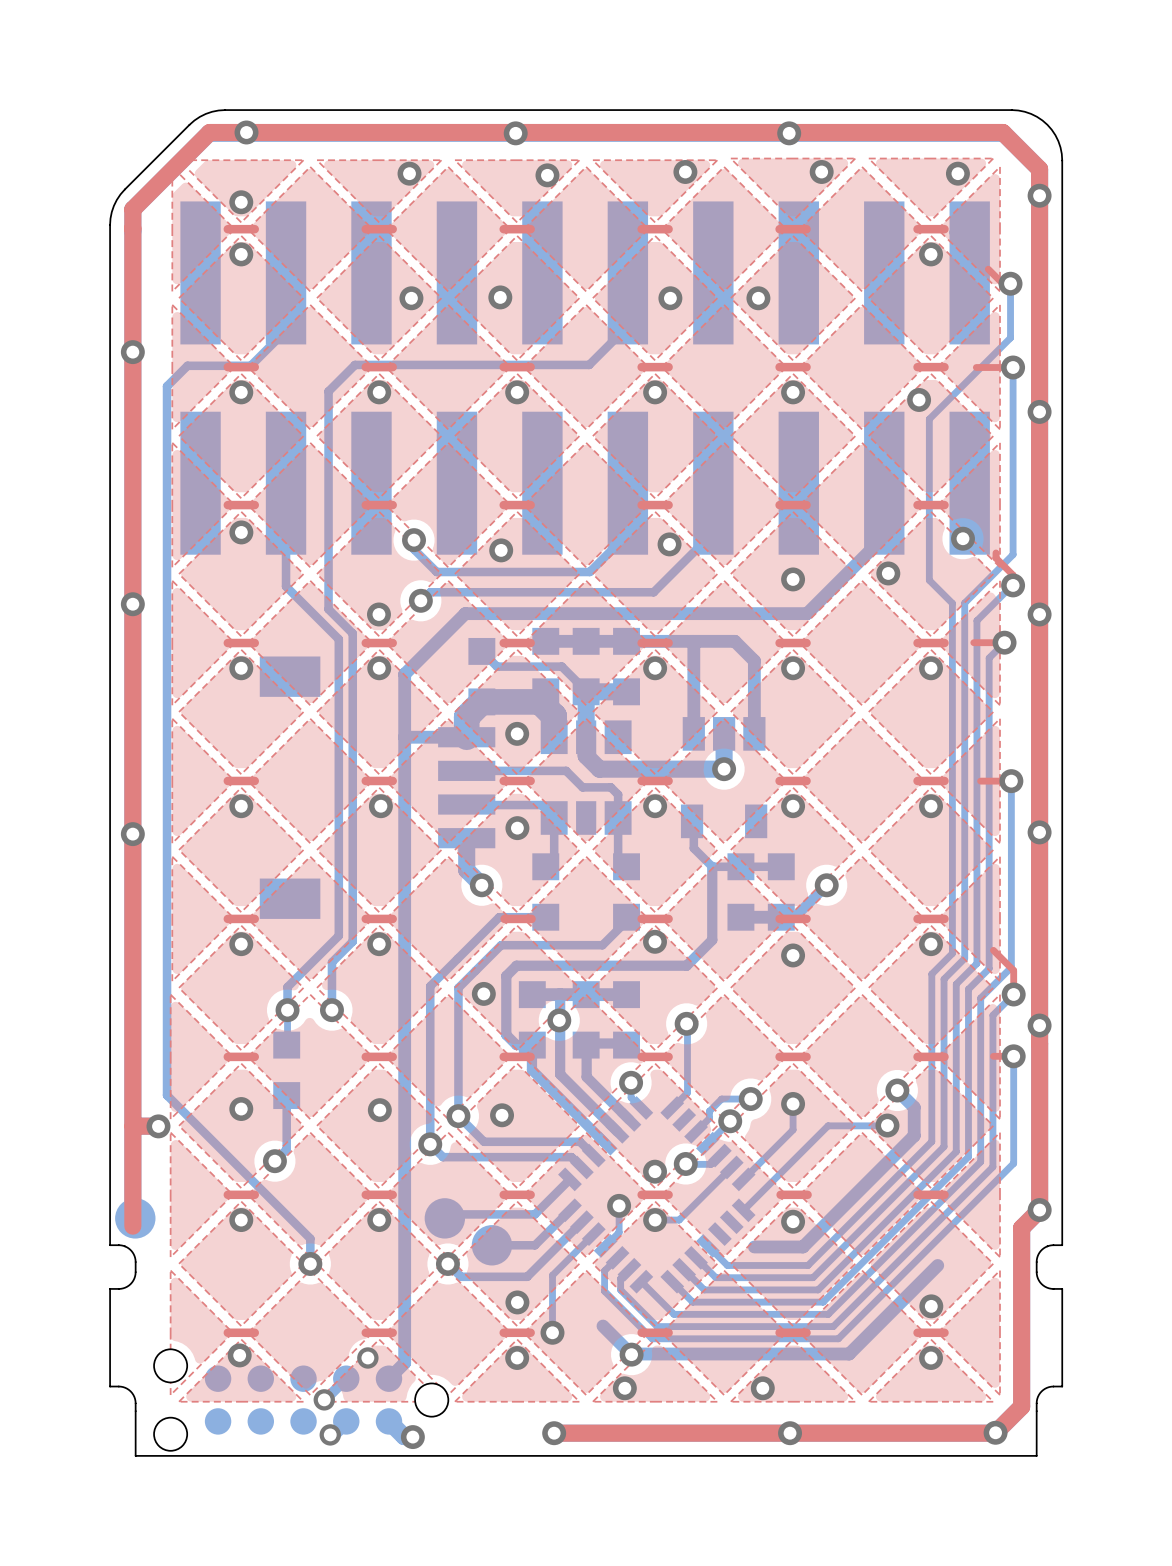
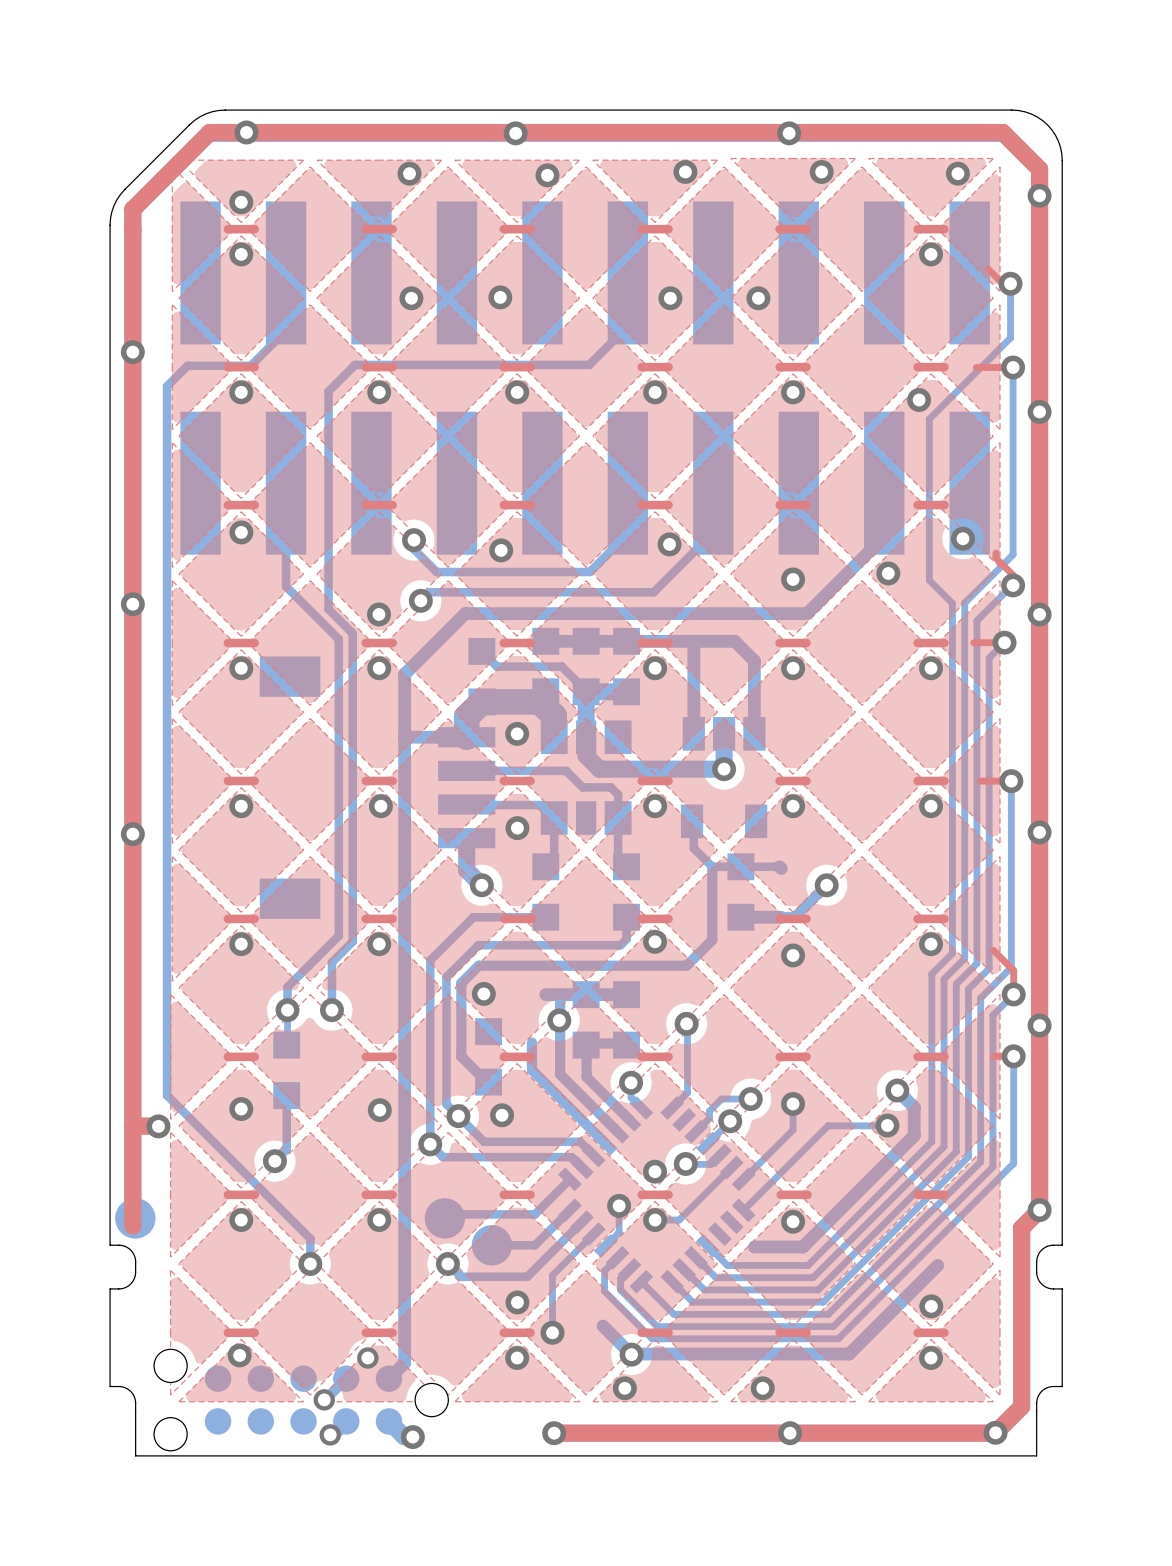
part: (781, 892) -> none
bottom track: (499, 917) (430, 986) -> (499, 917) (473, 917) (430, 960) (430, 986)
bottom track: (626, 921) (602, 945) -> (626, 921) (626, 939) (620, 945) (602, 945)
bottom track: (501, 945) (458, 987) (458, 1116) -> (501, 945) (478, 945) (446, 977) (446, 1104) (458, 1116)
bottom track: (516, 965) (506, 975) (506, 1034) (516, 1045) (532, 1045) -> (516, 965) (478, 965) (461, 983) (461, 1056) (481, 1077)
part position: (532, 1019) -> (488, 1056)

